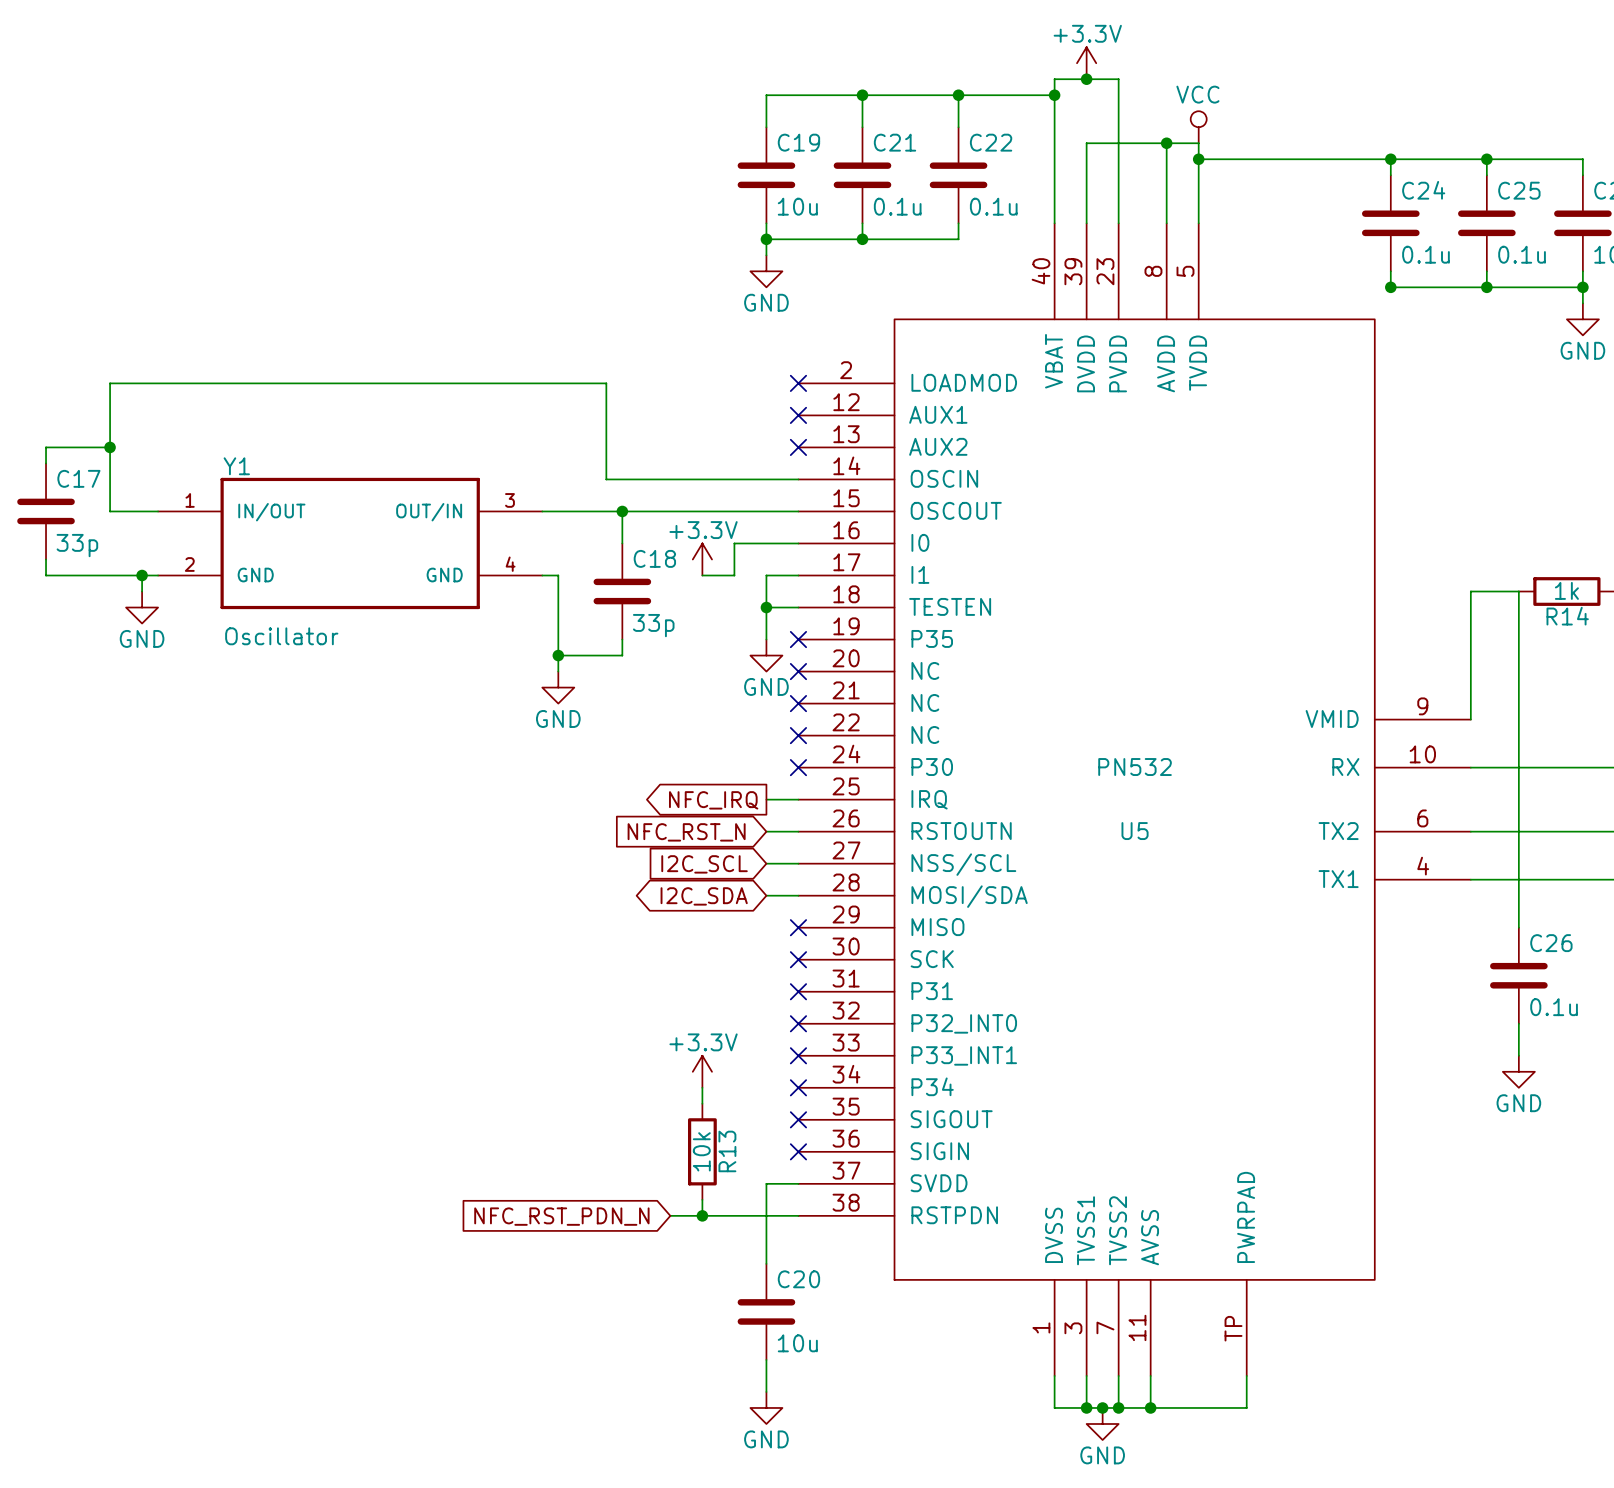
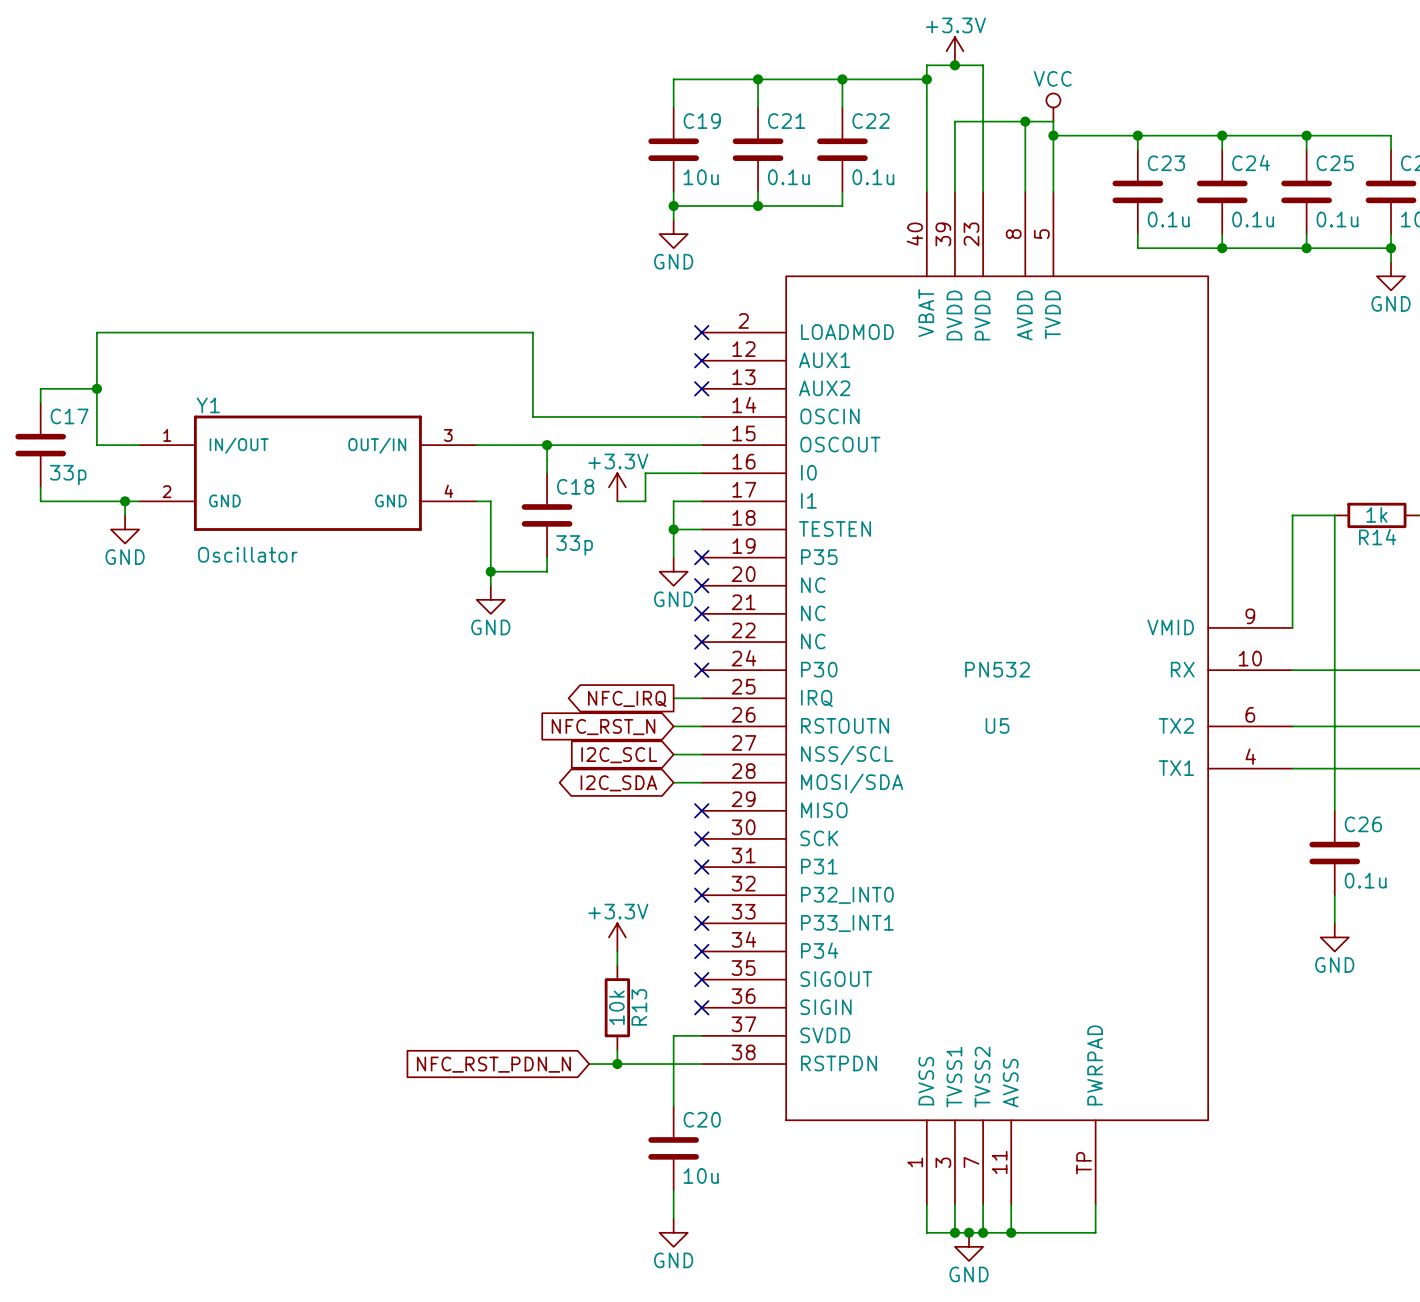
wire: none -> (1137, 135) (1137, 149)
junction: none -> (1137, 135)
C23: none -> 0.1u (1137, 191)
wire: none -> (1137, 234) (1137, 248) (1222, 248)

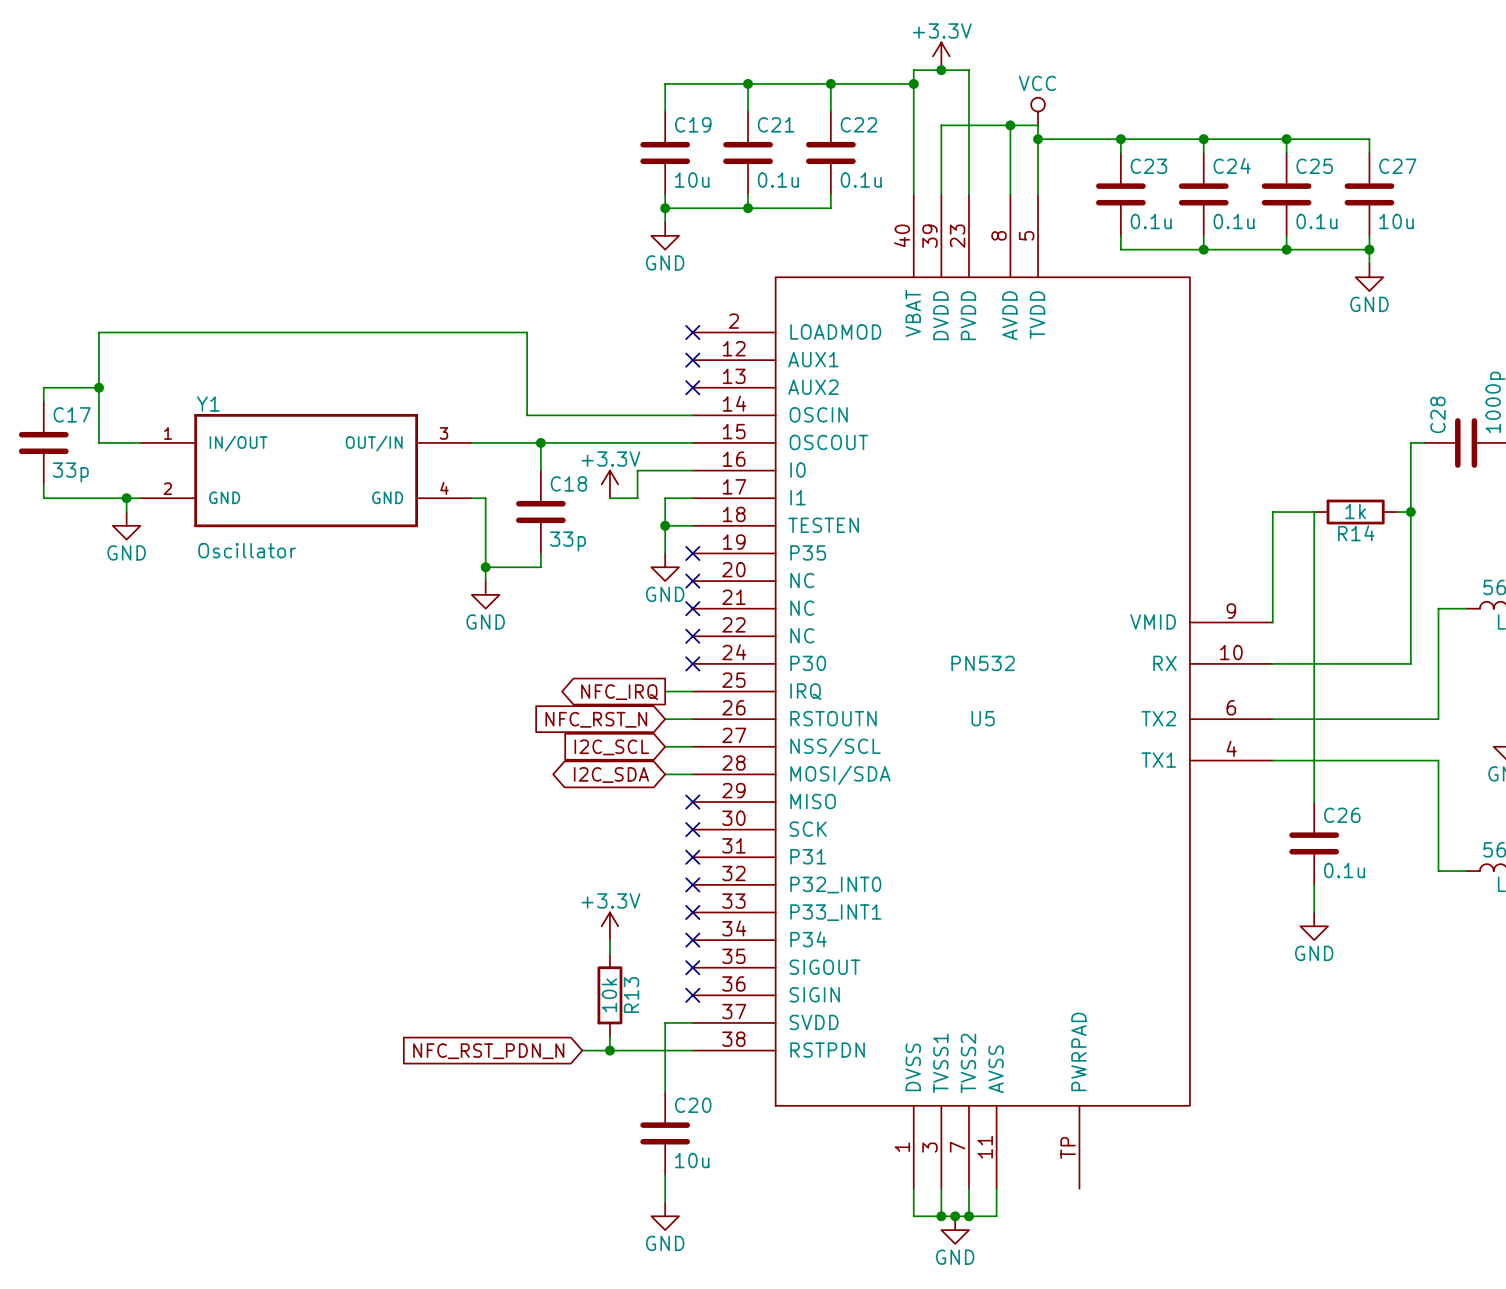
wire: (1095, 1204) (1095, 1232) (1011, 1232) -> none
junction: (1011, 1232) -> none

